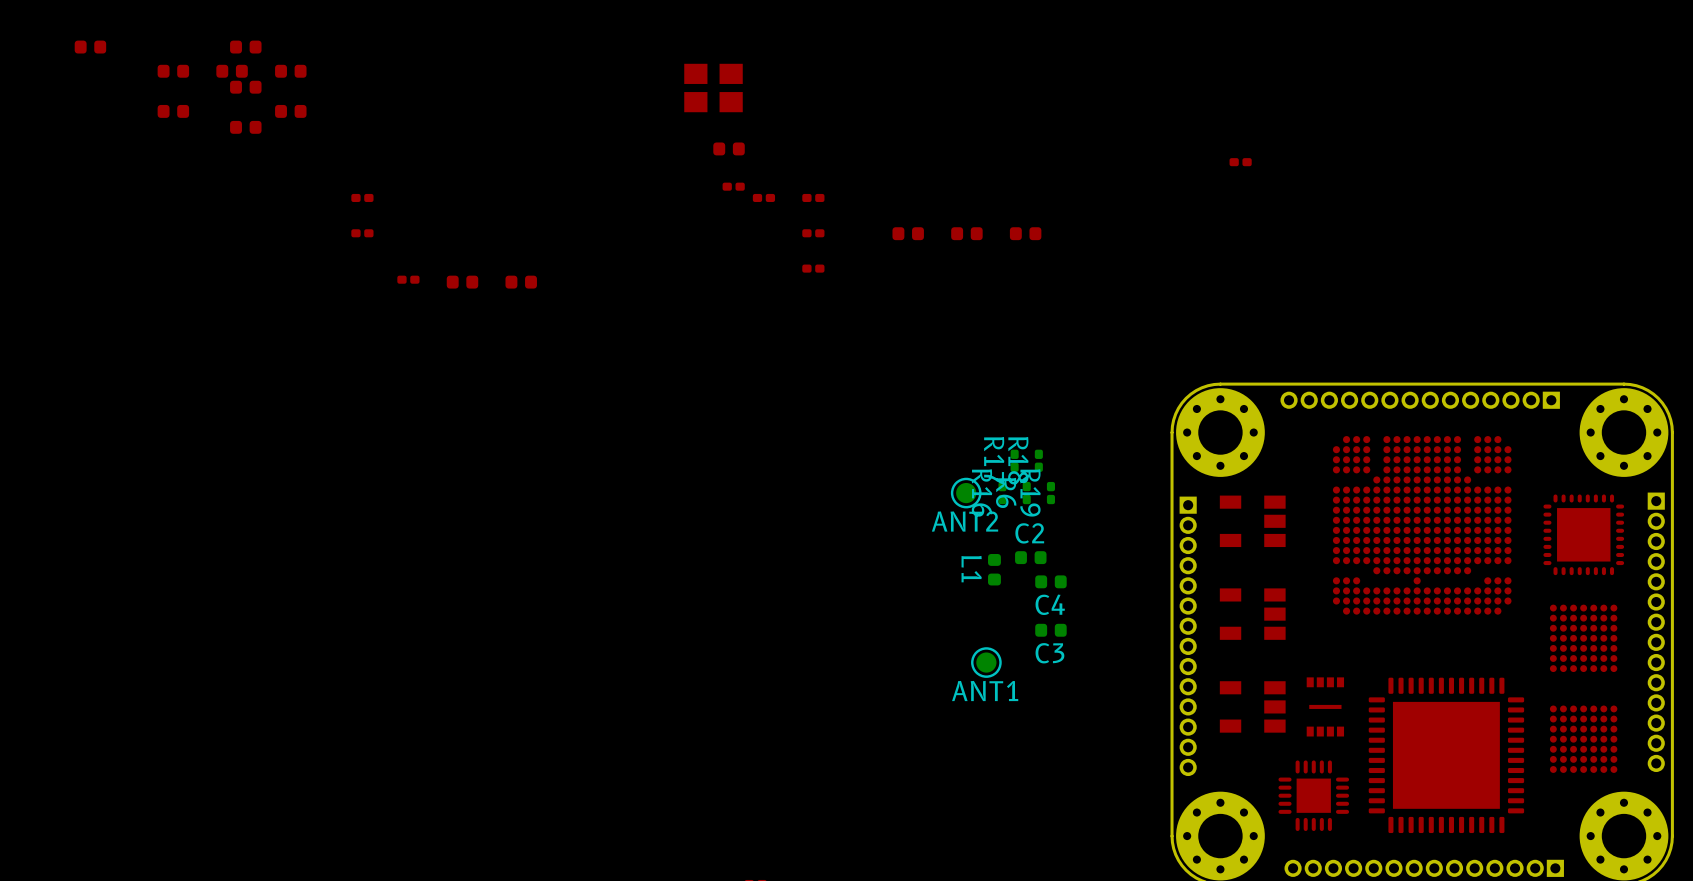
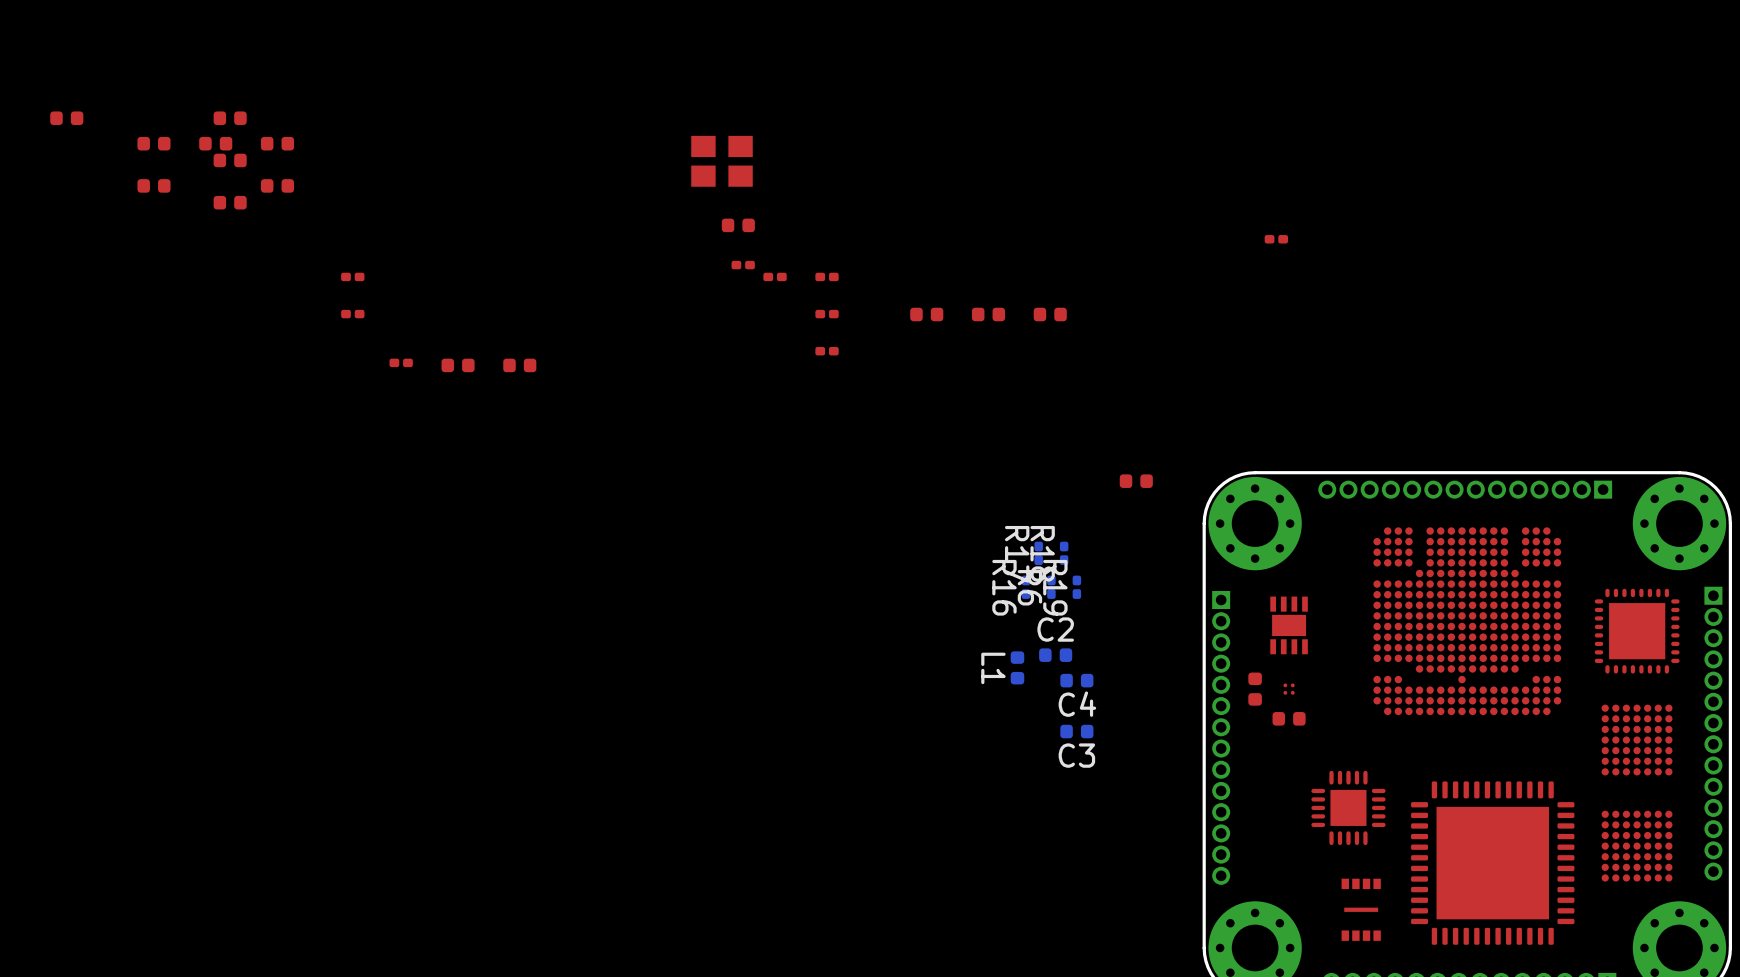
part: none -> (1136, 481)
ANT2: (966, 493) -> none
part footprint: [1219, 495, 1286, 548] -> [1270, 596, 1308, 655]
part footprint: [1219, 588, 1286, 640] -> [1272, 712, 1306, 726]
part: none -> (1255, 689)
part: none -> (1289, 689)
ANT1: (986, 662) -> none
part footprint: [1306, 677, 1345, 737] -> [1311, 770, 1386, 846]
part: (1252, 706) -> none
part footprint: [1278, 760, 1350, 832] -> [1341, 878, 1381, 941]

